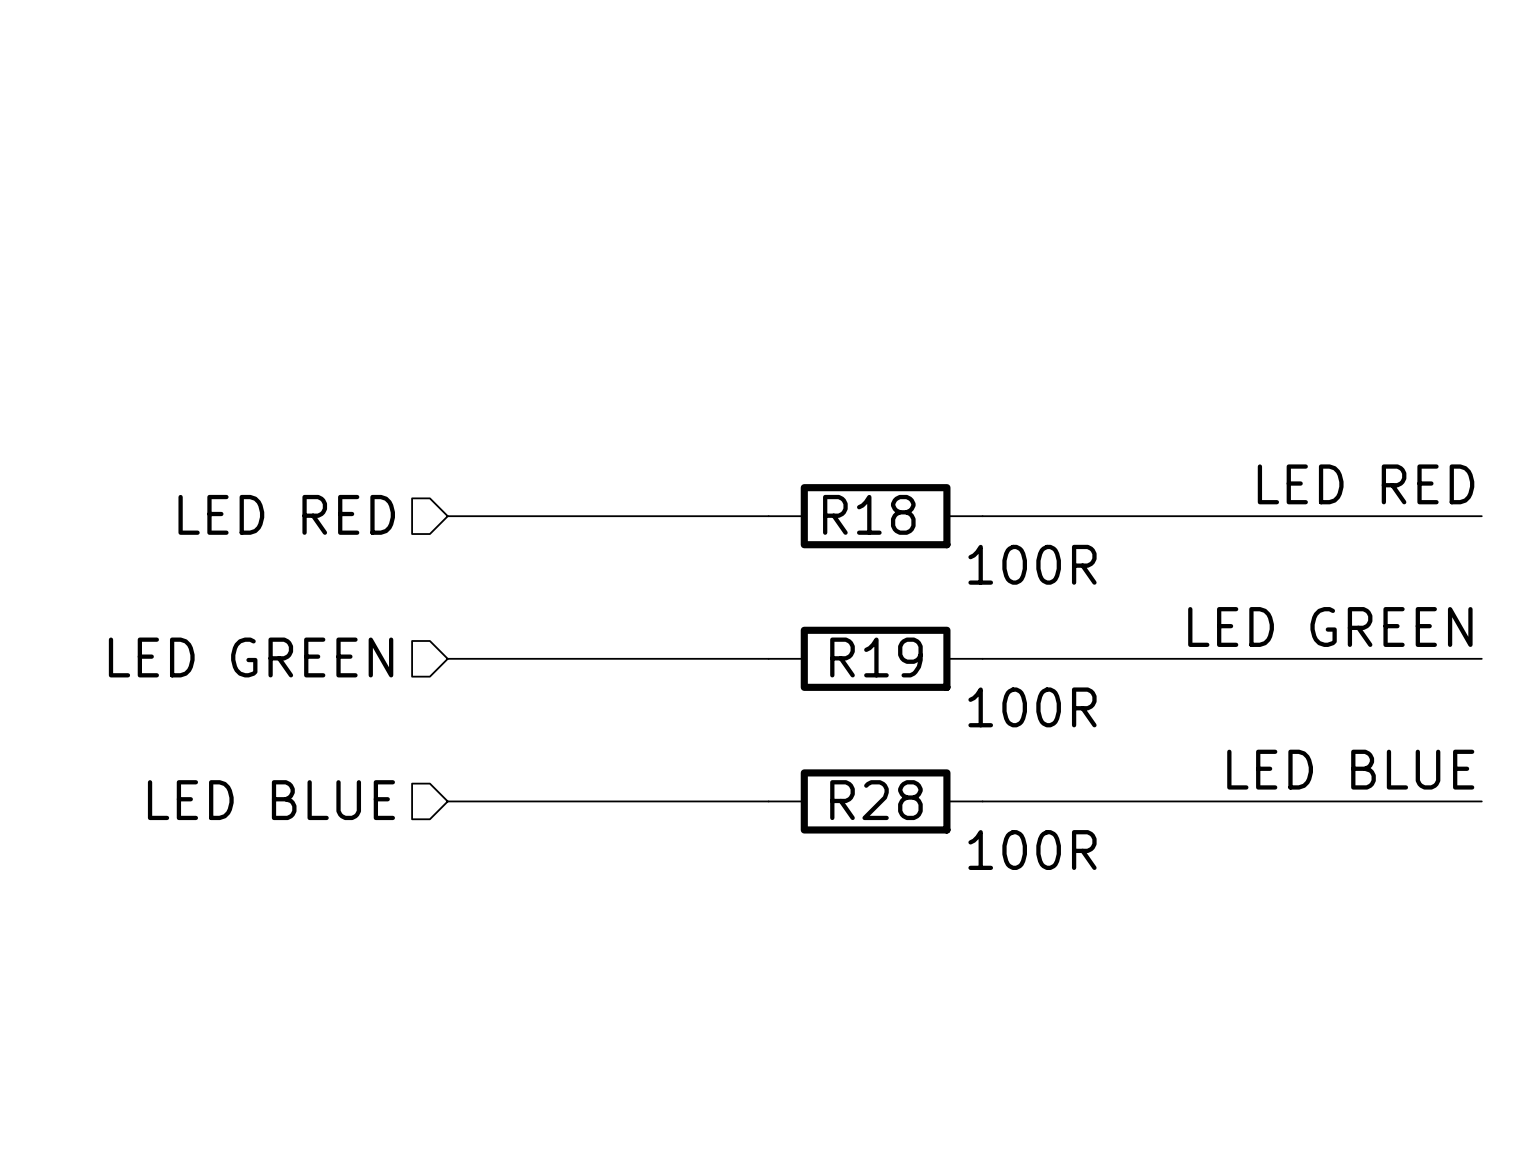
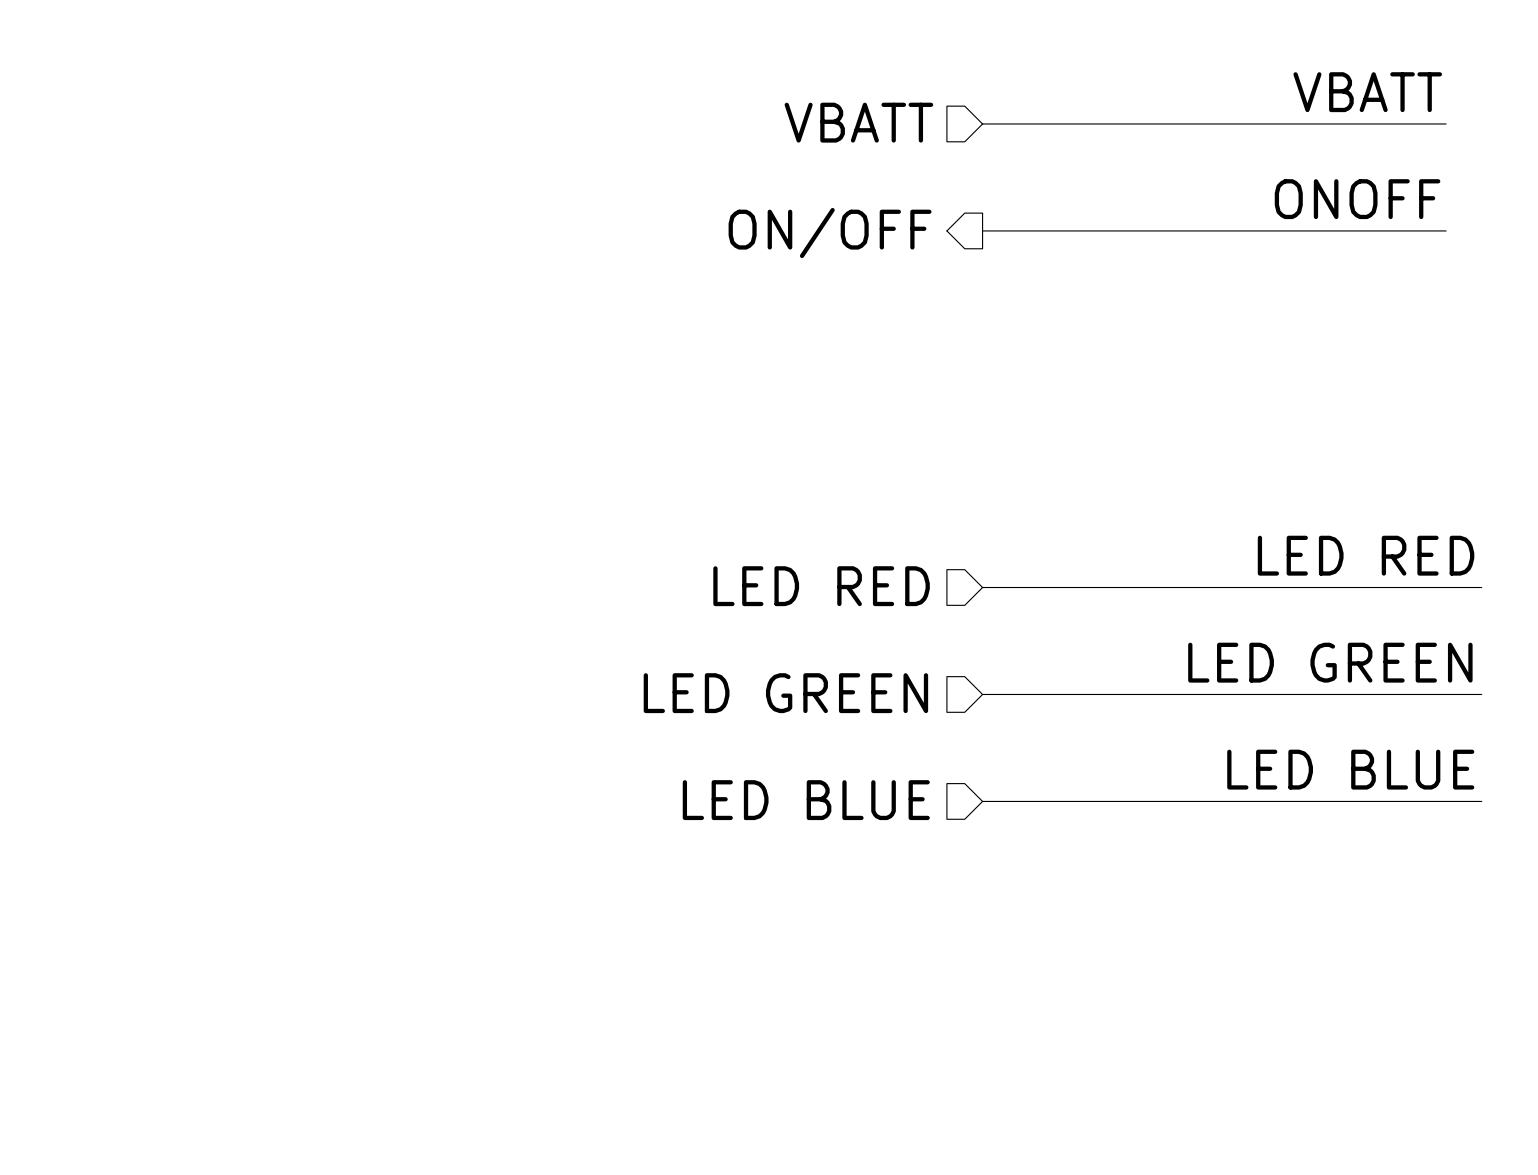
label: none -> VBATT (1367, 92)
hierarchical label: none -> VBATT (858, 122)
wire: none -> (982, 123) (1446, 123)
label: none -> ONOFF (1357, 199)
wire: none -> (982, 230) (1446, 230)
hierarchical label: none -> ON/OFF (830, 233)
label position: LED RED (1366, 484) -> LED RED (1366, 555)
hierarchical label position: LED RED (286, 514) -> LED RED (821, 586)
wire: (447, 516) (768, 516) -> none
R18: 100R (875, 516) -> none
wire: (982, 516) (1481, 516) -> (982, 587) (1481, 587)
label position: LED GREEN (1330, 627) -> LED GREEN (1330, 662)
hierarchical label position: LED GREEN (251, 657) -> LED GREEN (785, 693)
wire: (447, 658) (768, 658) -> none
R19: 100R (875, 658) -> none
wire: (982, 658) (1481, 658) -> (982, 694) (1481, 694)
hierarchical label position: LED BLUE (271, 800) -> LED BLUE (806, 800)
wire: (447, 801) (768, 801) -> none
R28: 100R (875, 801) -> none

